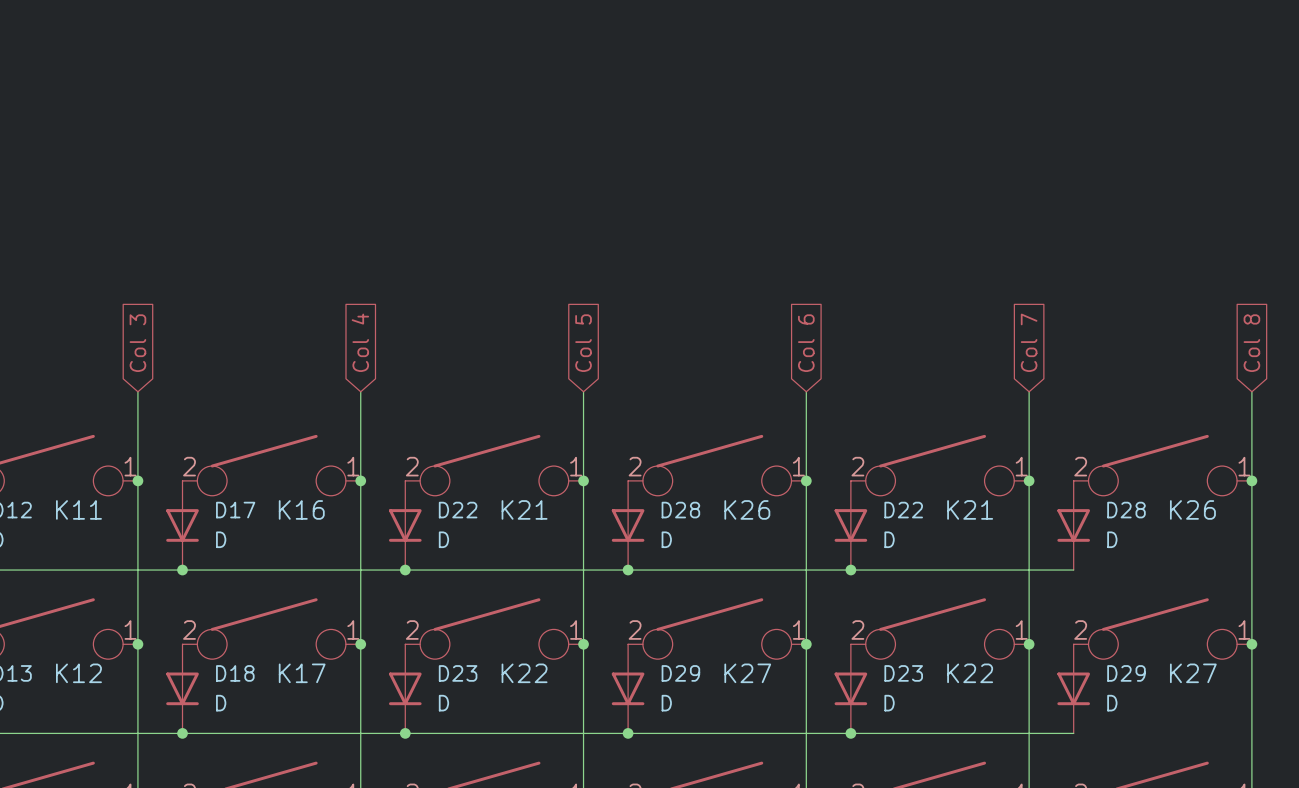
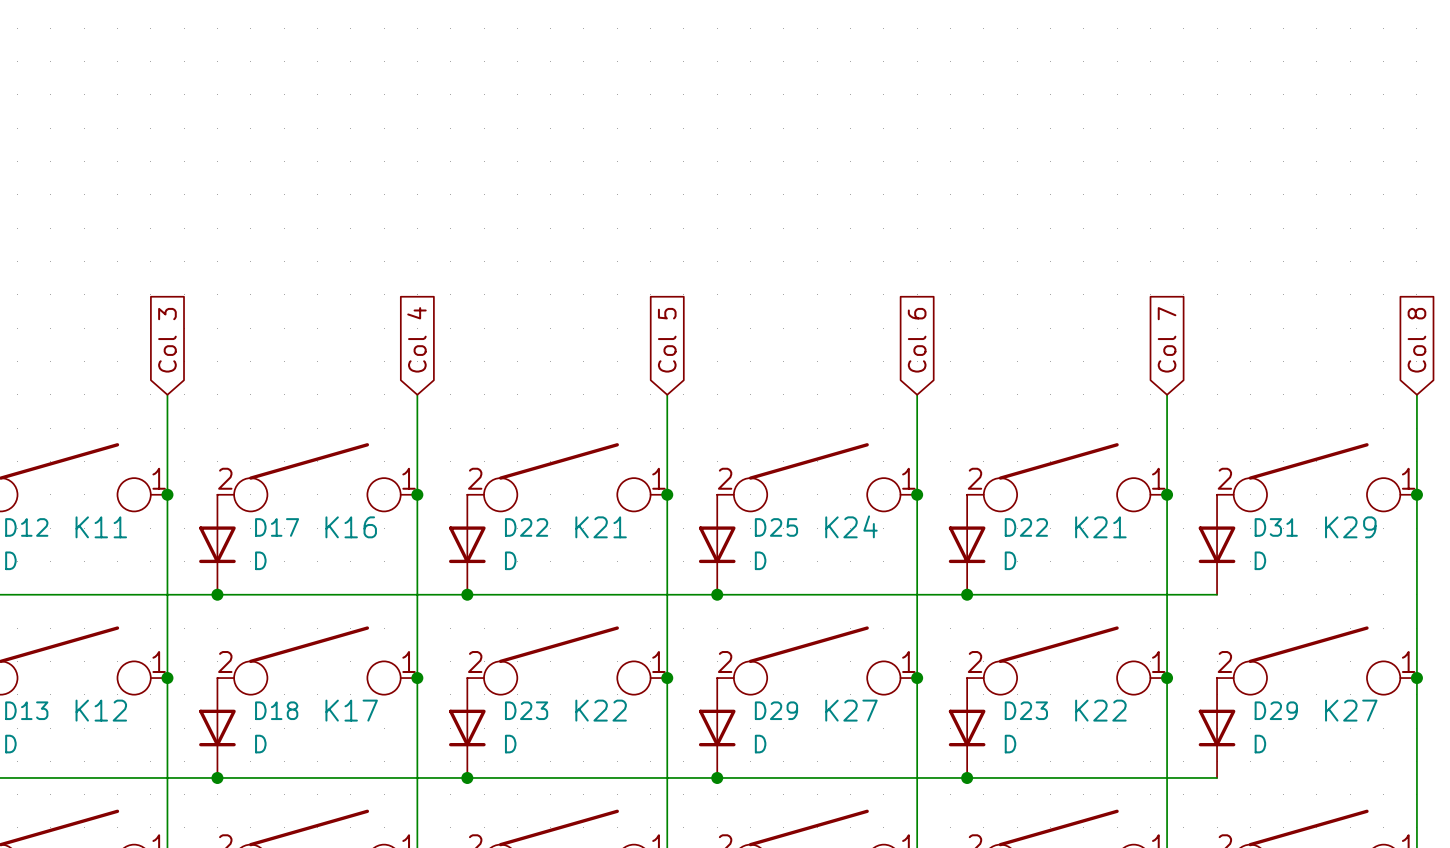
K26 name: K26 (747, 509) -> K24 (851, 526)
K26 name: K26 (1192, 509) -> K29 (1350, 527)
D28 name: D28 (680, 510) -> D25 (776, 527)
D28 name: D28 (1126, 510) -> D31 (1276, 527)

